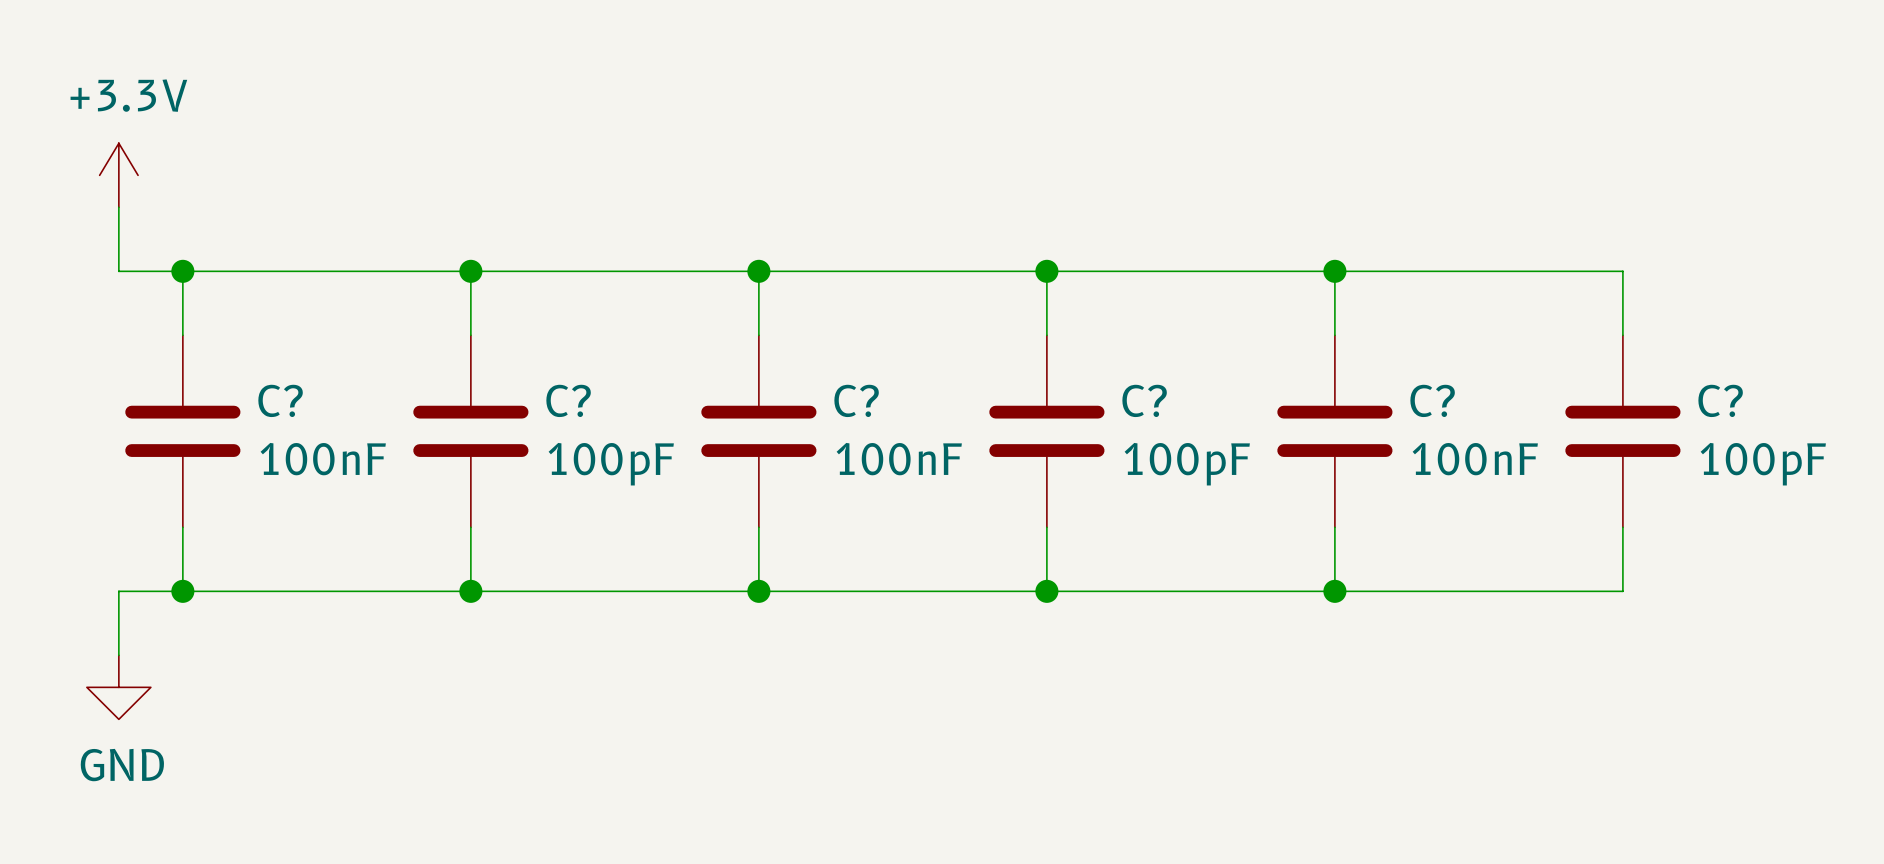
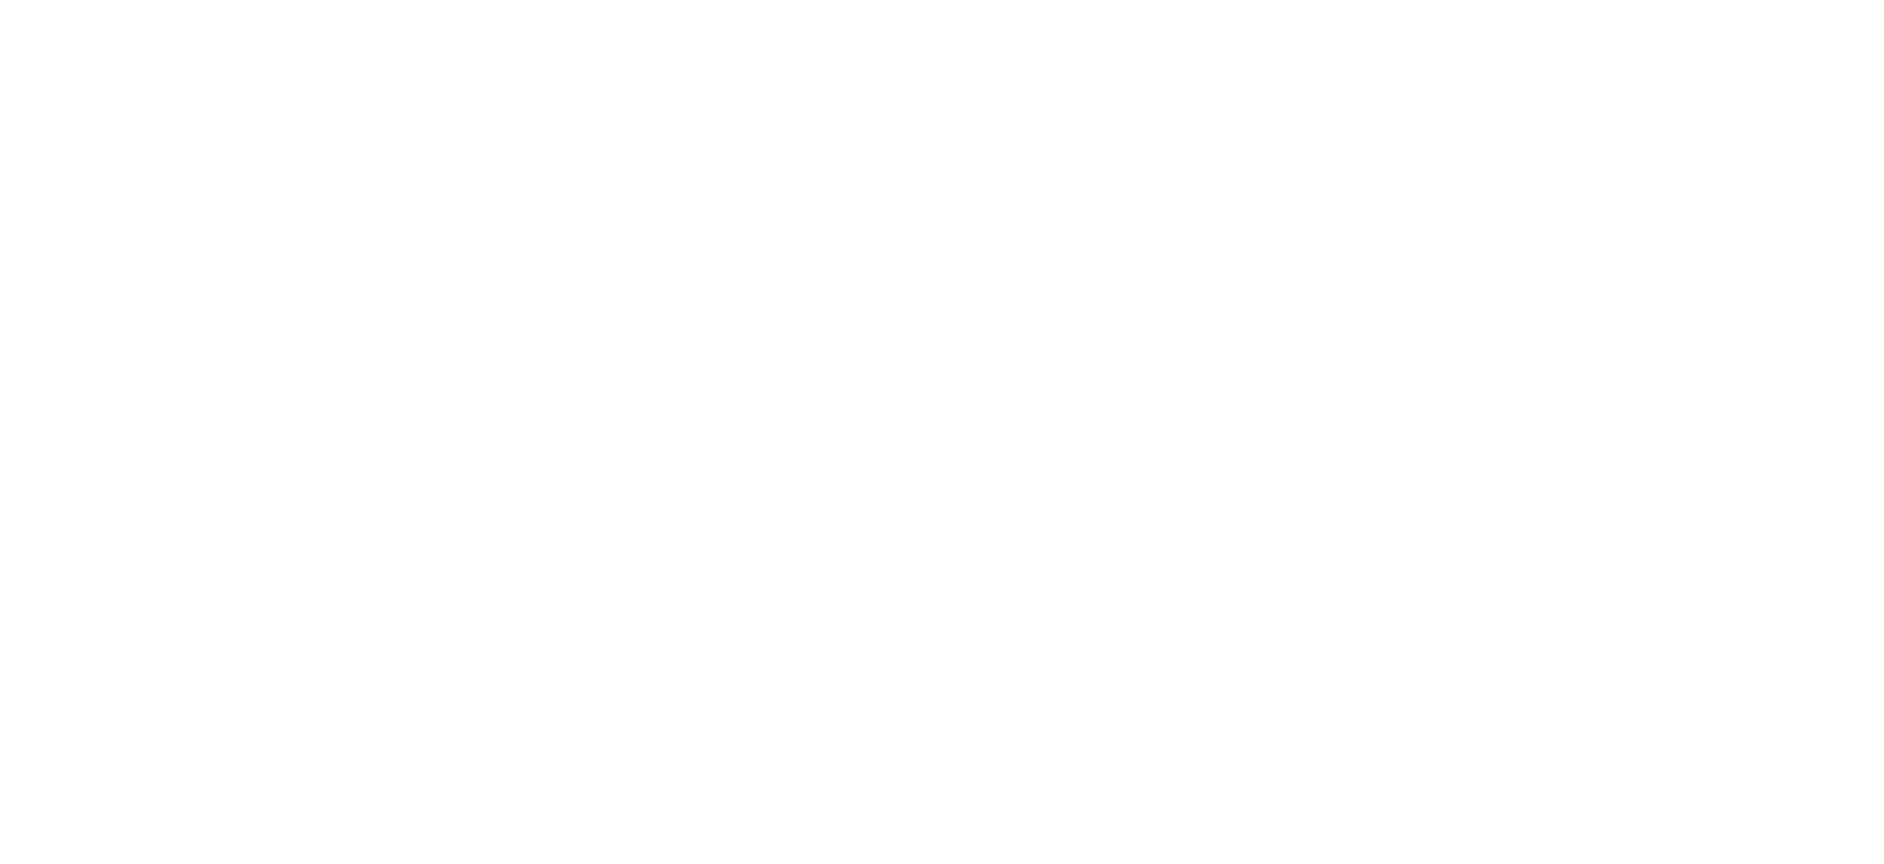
power symbol: +3.3V (118, 175) -> none
wire: (118, 207) (118, 271) (1622, 271) (1622, 335) -> none
wire: (182, 271) (182, 335) -> none
junction: (182, 271) -> none
wire: (470, 271) (470, 335) -> none
junction: (470, 271) -> none
wire: (758, 271) (758, 335) -> none
junction: (758, 271) -> none
wire: (1046, 271) (1046, 335) -> none
junction: (1046, 271) -> none
wire: (1334, 271) (1334, 335) -> none
junction: (1334, 271) -> none
C?: 100nF (182, 431) -> none
C?: 100pF (470, 431) -> none
C?: 100nF (758, 431) -> none
C?: 100pF (1046, 431) -> none
C?: 100nF (1334, 431) -> none
C?: 100pF (1622, 431) -> none
wire: (182, 527) (182, 591) -> none
wire: (470, 527) (470, 591) -> none
wire: (758, 527) (758, 591) -> none
wire: (1046, 527) (1046, 591) -> none
wire: (1334, 527) (1334, 591) -> none
wire: (1622, 527) (1622, 591) (118, 591) (118, 655) -> none
junction: (182, 591) -> none
junction: (470, 591) -> none
junction: (758, 591) -> none
junction: (1046, 591) -> none
junction: (1334, 591) -> none
power symbol: GND (118, 687) -> none

